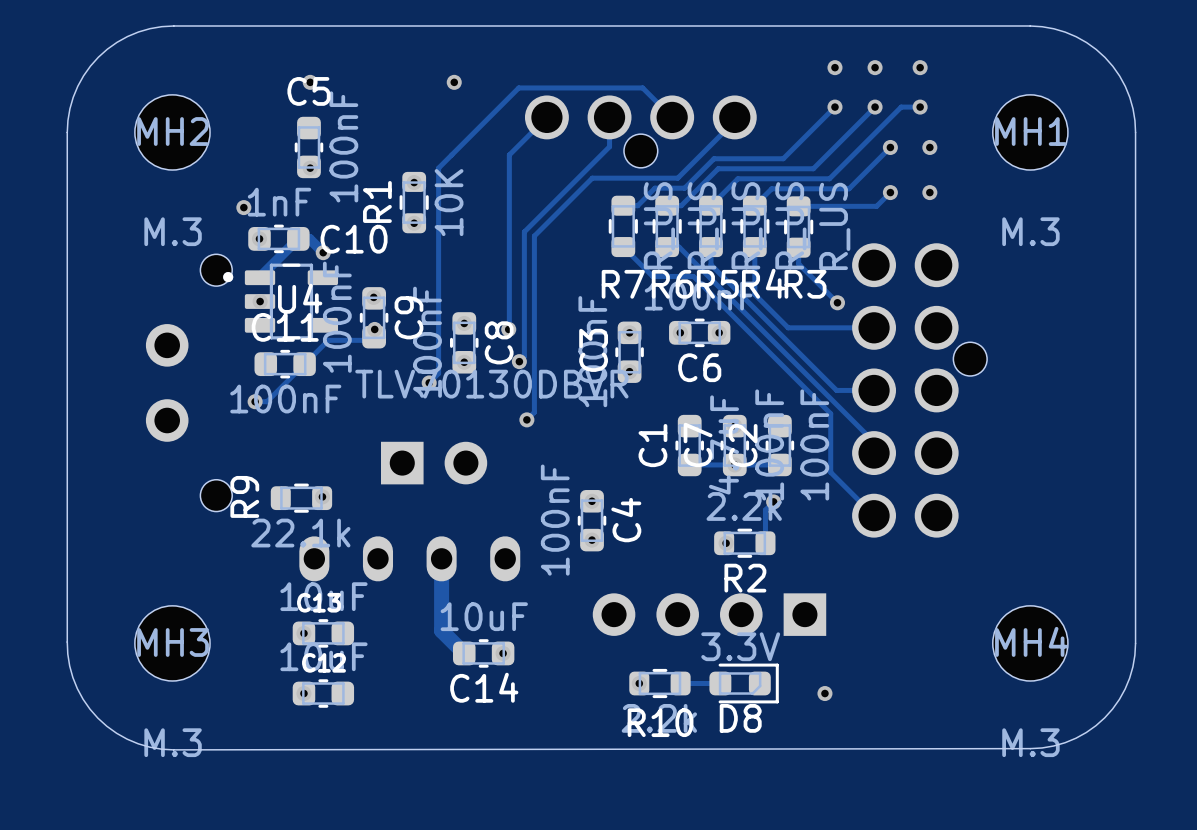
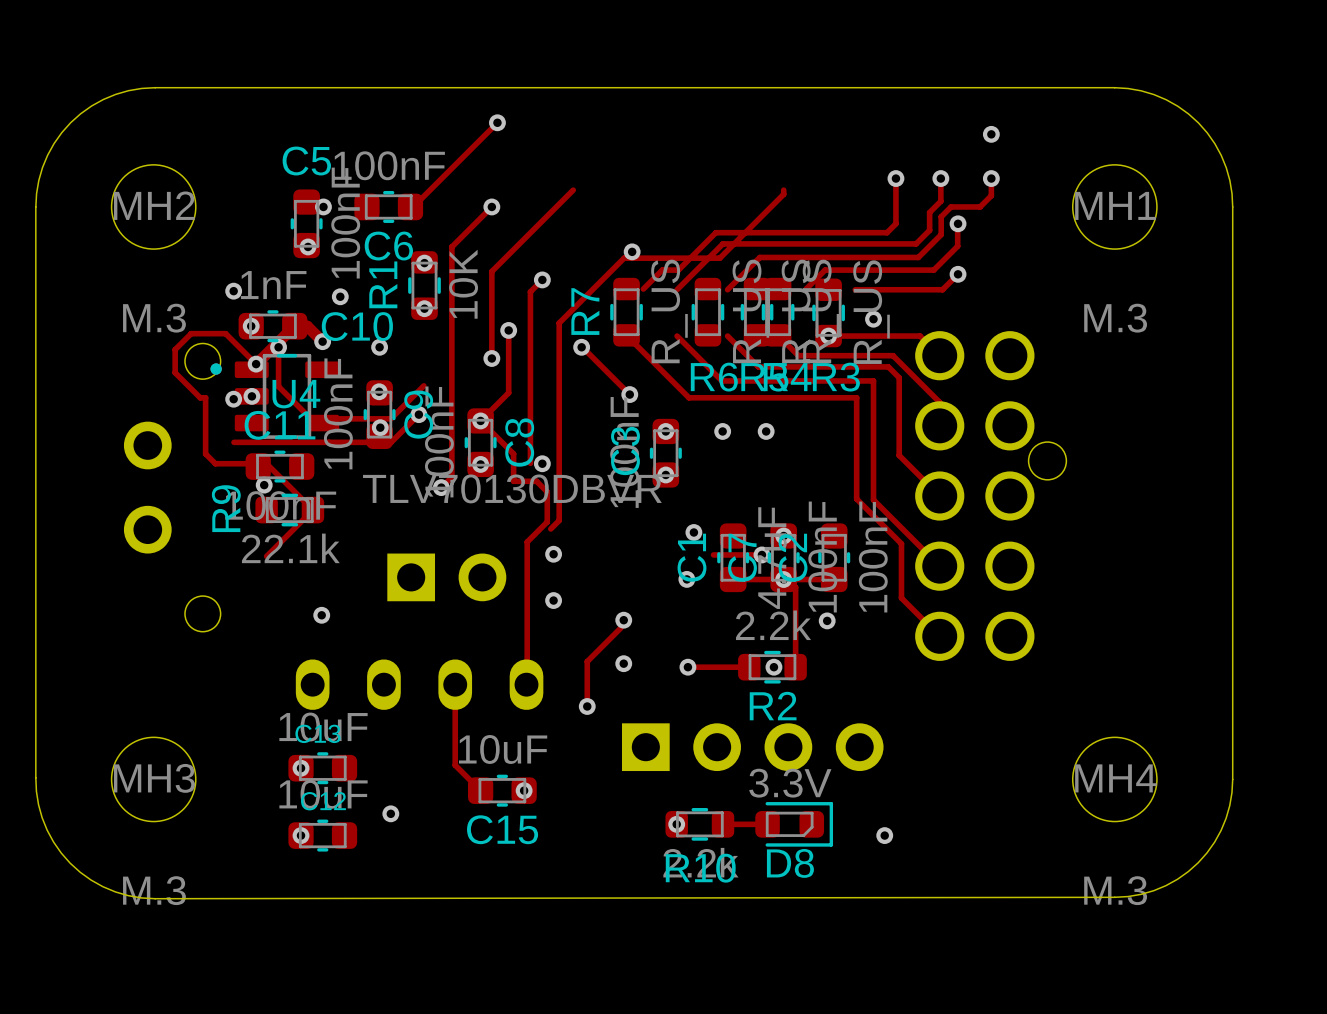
track: none -> (497, 122) (413, 206)
via: none -> (497, 122)
via: (834, 67) -> none
via: (875, 67) -> none
via position: (310, 82) -> (323, 206)
via: (454, 82) -> none
track: (834, 107) (783, 158) (714, 158) (684, 188) (654, 188) (647, 195) -> (895, 178) (895, 223) (887, 232) (715, 232) (678, 270) (662, 270) (643, 289)
track: (875, 107) (813, 168) (718, 168) (681, 205) (667, 205) -> (940, 178) (940, 201) (929, 212) (929, 230) (916, 243) (722, 243) (677, 289)
track: (920, 107) (901, 107) (829, 178) (737, 178) (710, 205) -> (991, 178) (991, 195) (980, 206) (951, 206) (941, 216) (941, 234) (918, 257) (759, 257) (727, 289)
track: (609, 117) (609, 146) (524, 231) (524, 356) (519, 361) -> none
track: (672, 117) (642, 87) (518, 87) (474, 132) -> none
part: (640, 131) -> none
via: none -> (491, 206)
track: (890, 147) (849, 188) -> (957, 224) (957, 246) (933, 270) (911, 270)
via: (929, 147) -> none
track: (509, 154) (508, 329) -> (531, 232) (491, 271) (491, 358)
via: none -> (632, 251)
via: (929, 192) -> none
track: (647, 195) (637, 205) (623, 205) -> none
track: none -> (542, 279) (530, 291) (530, 463)
via: none -> (542, 279)
via: none -> (340, 296)
R7 position: (623, 226) -> (626, 312)
R4 position: (754, 226) -> (778, 312)
R3 position: (798, 227) -> (828, 312)
via: none -> (873, 319)
track: none -> (508, 330) (508, 392) (480, 420) (513, 453) (513, 481) (536, 481) (547, 491) (547, 521) (527, 542) (527, 662)
via: none -> (508, 330)
track: (623, 247) (652, 276) (693, 276) (830, 413) (830, 472) (839, 481) -> (626, 335) (688, 397) (856, 397) (856, 498) (901, 543) (901, 598)
track: (667, 247) (679, 247) (874, 442) (874, 453) -> (677, 336) (721, 380) (873, 380) (873, 499) (939, 566)
track: (710, 247) (710, 264) (836, 390) (874, 390) -> (727, 336) (758, 366) (888, 366) (899, 377) (899, 455) (939, 496)
track: (754, 247) (754, 294) (788, 327) (874, 327) -> (778, 335) (798, 355) (893, 355) (939, 402) (939, 425)
track: none -> (828, 336) (920, 336) (939, 355)
via: none -> (828, 336)
track: (798, 247) (798, 263) (837, 302) -> none
track: none -> (278, 347) (278, 386) (310, 418) (390, 418) (423, 385)
via: none -> (278, 347)
via: none -> (379, 347)
track: none -> (581, 347) (629, 394)
via: none -> (581, 347)
via: none -> (491, 358)
track: none -> (256, 364) (225, 333) (191, 333) (175, 349) (175, 372) (200, 397) (205, 397) (205, 453) (215, 463) (266, 463) (312, 510) (266, 556)
via: none -> (256, 364)
R7 name rotation: 0° (623, 284) -> 90° counterclockwise (585, 311)
R7 name position: R7 (623, 284) -> R7 (585, 311)
via: none -> (629, 394)
via: (837, 302) -> none
via: none -> (233, 399)
track: none -> (418, 414) (391, 442) (234, 442)
via: none -> (418, 414)
via: (508, 329) -> none
C6 position: (699, 332) -> (388, 206)
track: (374, 337) (374, 329) (363, 340) (328, 340) (267, 401) (255, 401) -> none
via position: (255, 401) -> (264, 485)
via position: (526, 419) -> (553, 554)
via: none -> (693, 532)
track: none -> (713, 554) (761, 554)
via: none -> (761, 554)
via: none -> (686, 579)
track: none -> (789, 580) (795, 587) (795, 667)
via: none -> (553, 600)
R9 position: (301, 498) -> (289, 510)
track: (773, 501) (765, 510) (765, 543) -> none
track: none -> (620, 627) (587, 661) (587, 706)
C4: 100nF (592, 520) -> none
track: none -> (687, 667) (749, 667)
via: none -> (687, 667)
R2 position: (744, 543) -> (772, 667)
track width: thick (441, 558) (441, 630) (464, 653) -> thin (455, 684) (455, 765) (480, 790)
via: none -> (587, 706)
part rotation: 0° (709, 614) -> 180° (752, 747)
via: none -> (390, 813)
C14 name: C14 (484, 687) -> C15 (502, 829)

